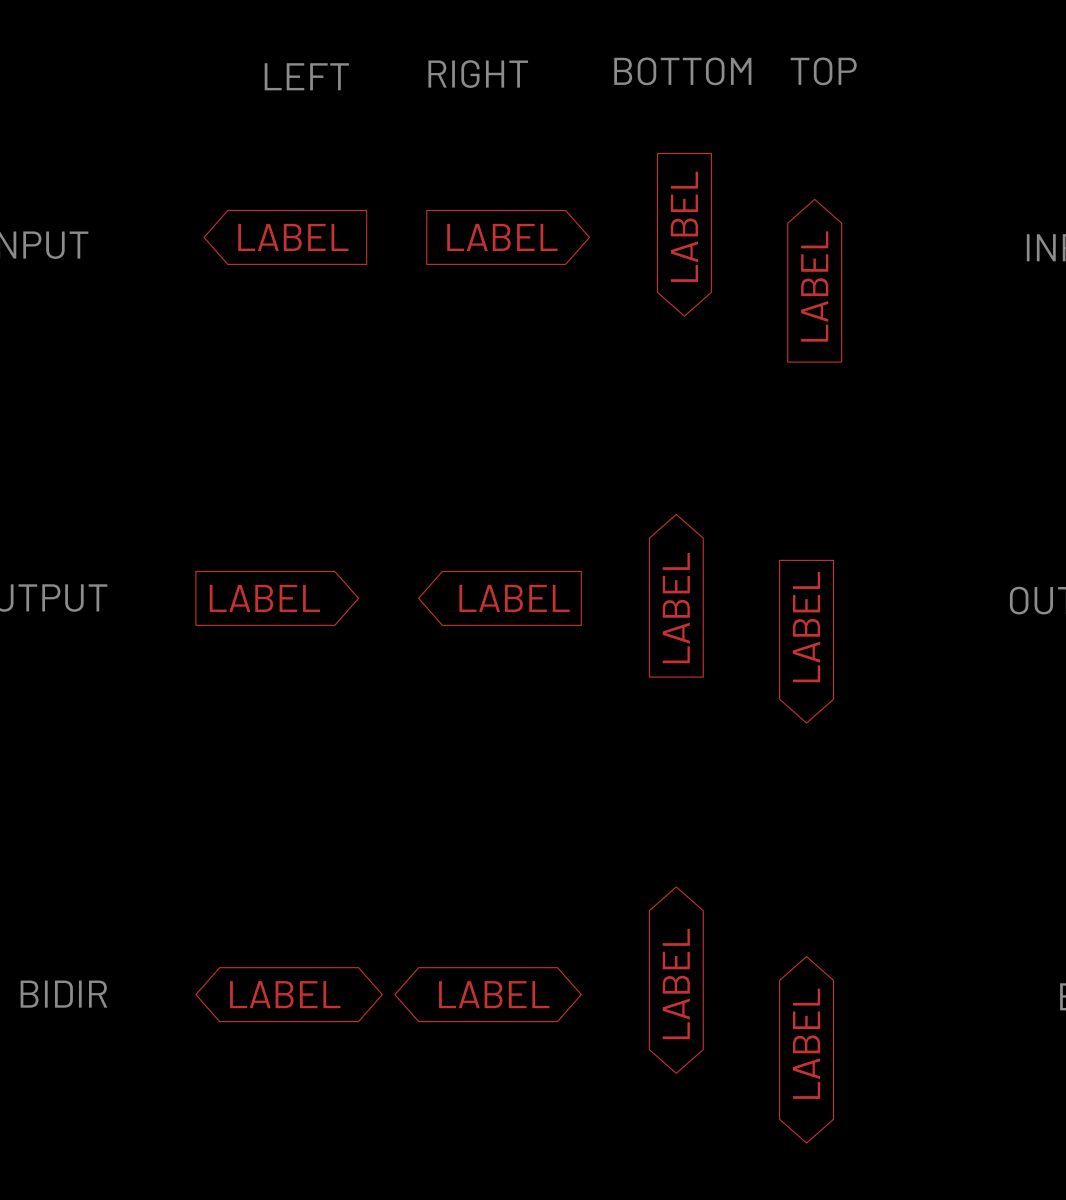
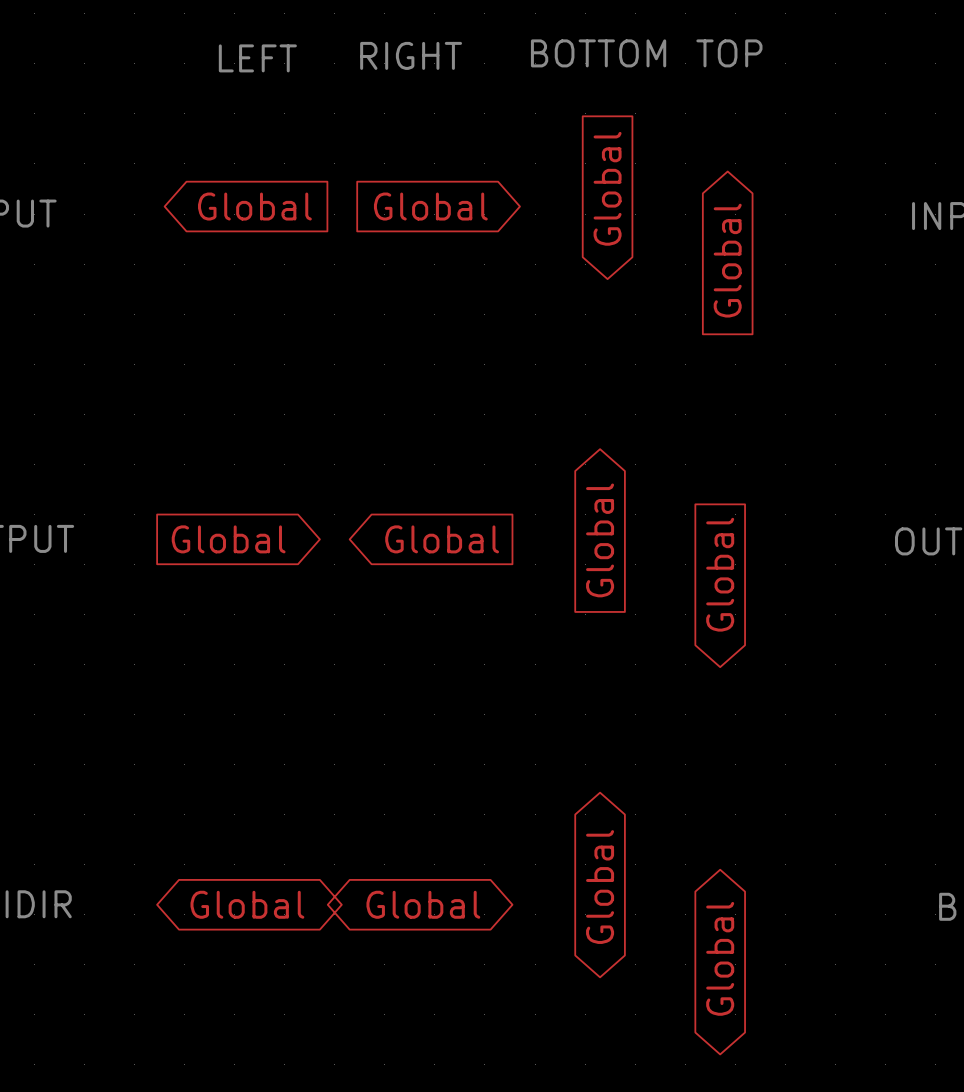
global label: LABEL (684, 226) -> Global (607, 188)
global label: LABEL (293, 237) -> Global (254, 206)
global label: LABEL (502, 237) -> Global (430, 206)
global label: LABEL (814, 286) -> Global (727, 260)
global label: LABEL (264, 598) -> Global (228, 539)
global label: LABEL (514, 598) -> Global (442, 539)
global label: LABEL (676, 608) -> Global (600, 540)
global label: LABEL (806, 627) -> Global (720, 574)
global label: LABEL (676, 984) -> Global (600, 887)
global label: LABEL (285, 994) -> Global (247, 904)
global label: LABEL (494, 994) -> Global (423, 904)
global label: LABEL (806, 1043) -> Global (720, 958)

